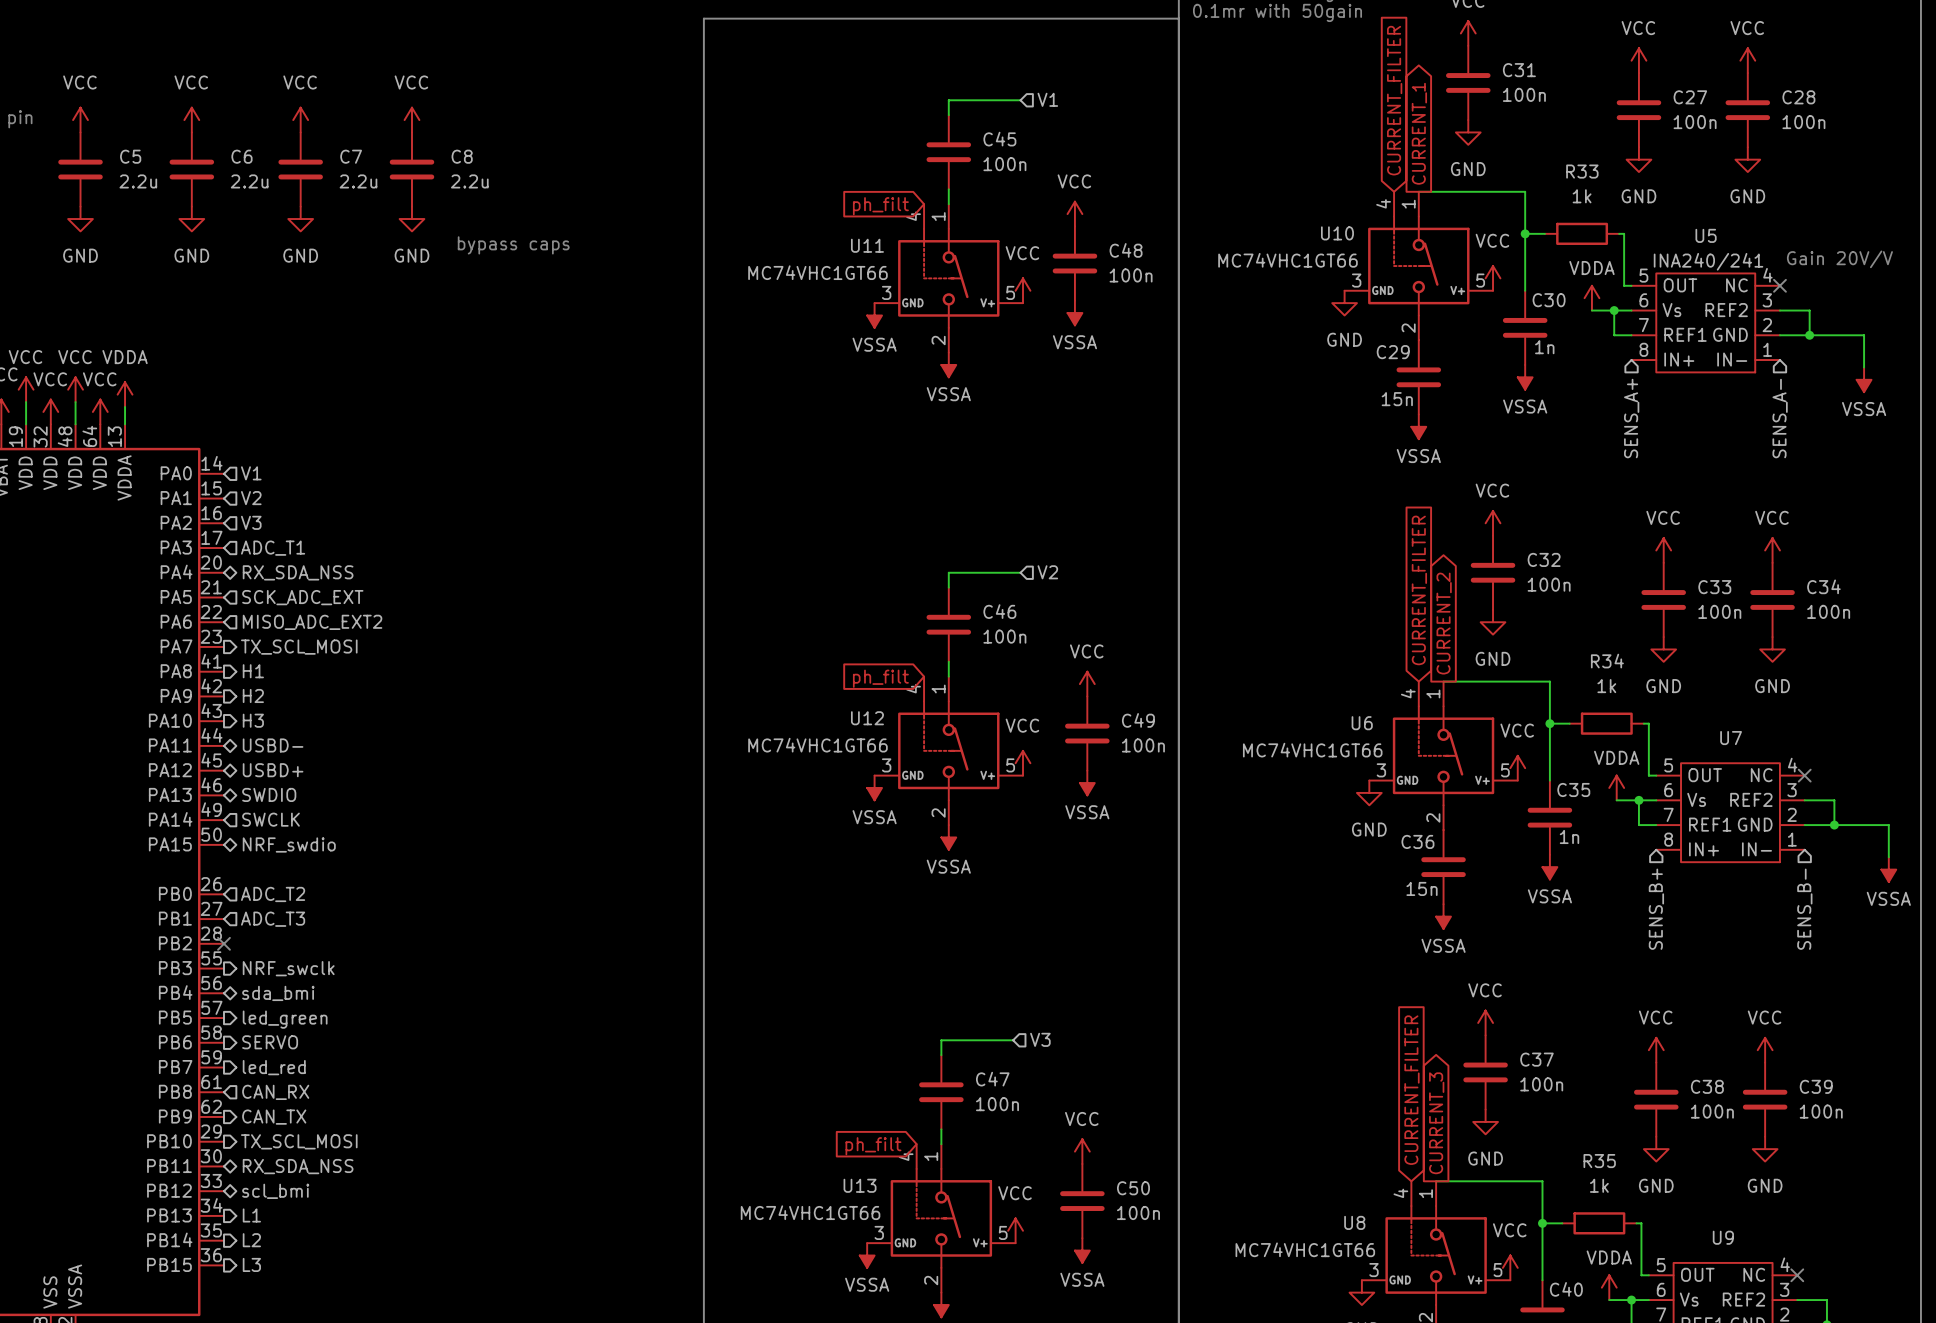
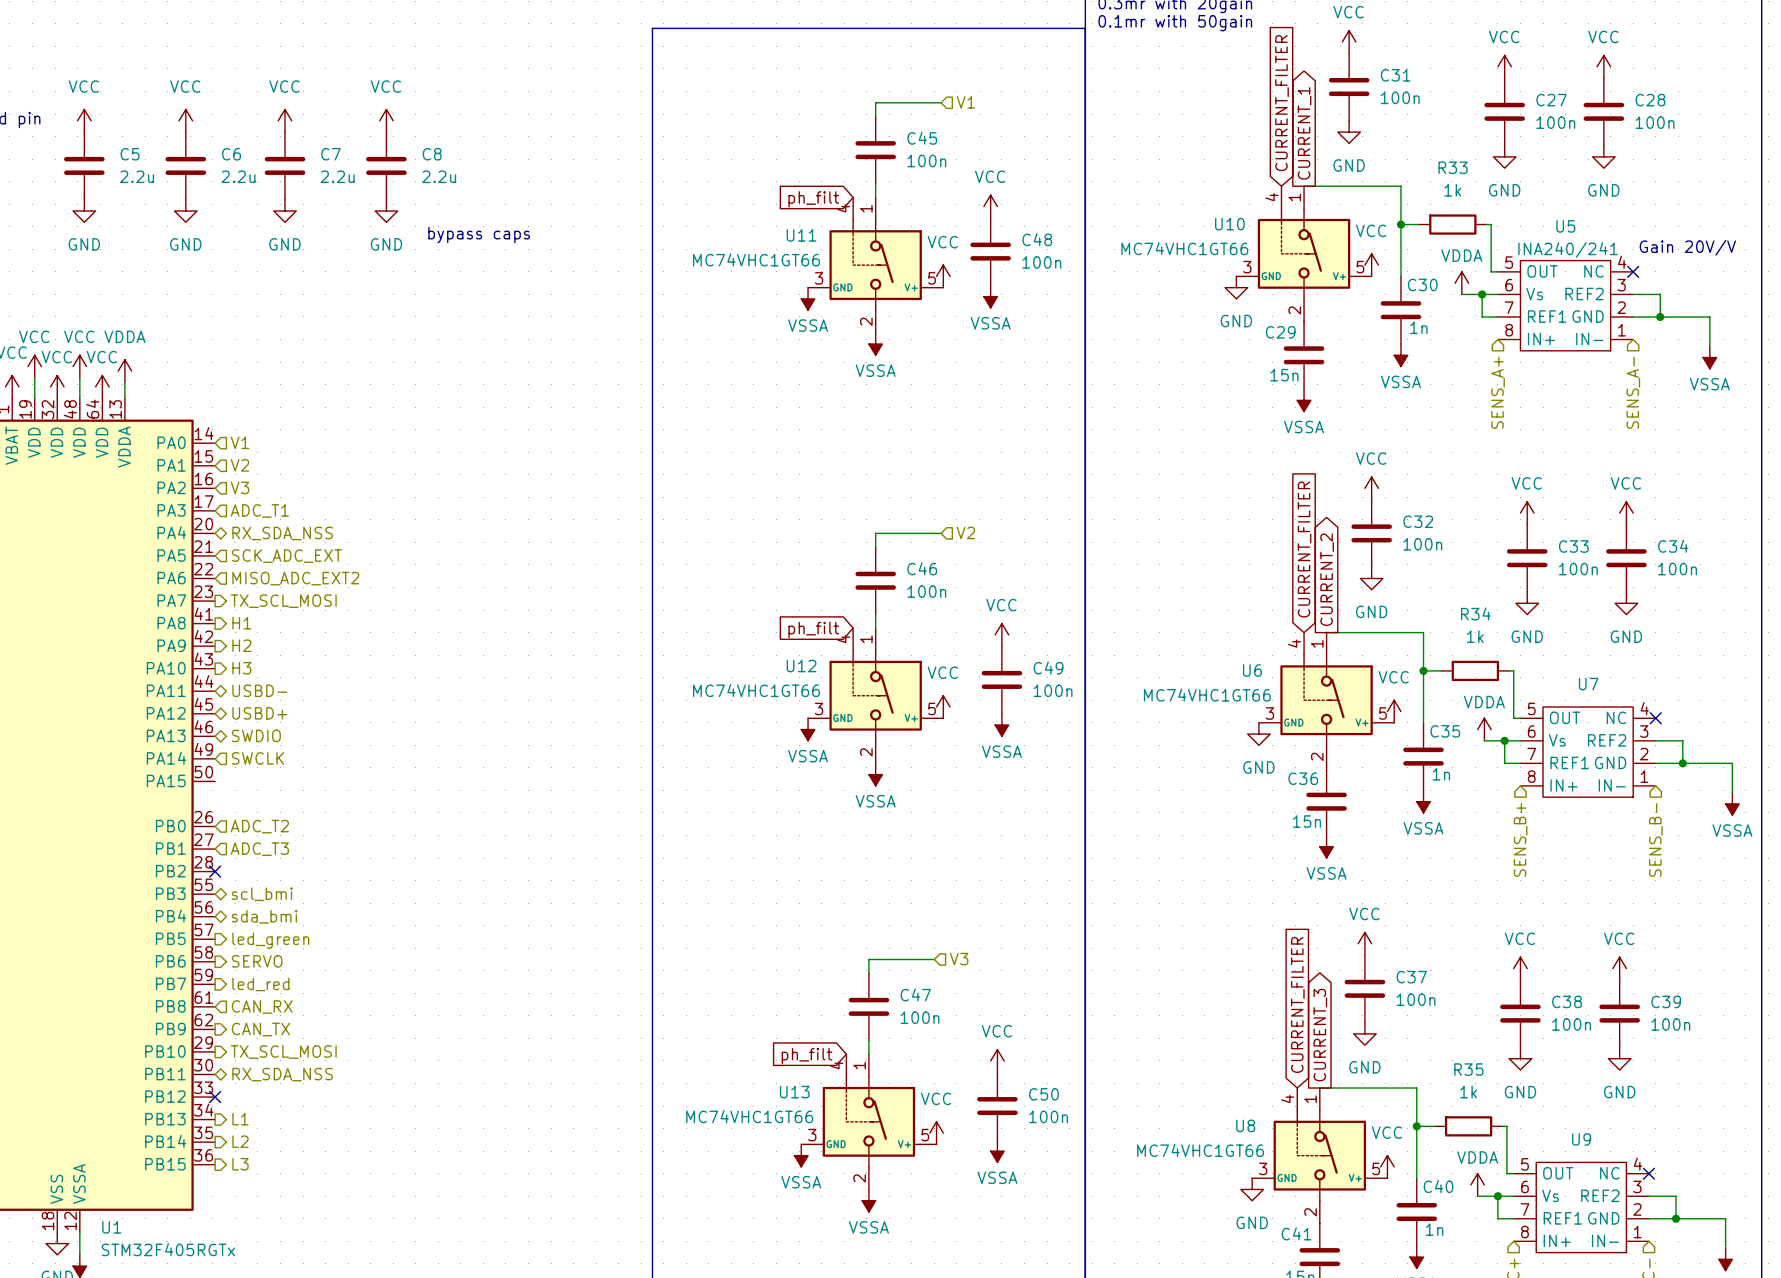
hierarchical label: NRF_swdio (289, 845) -> none
hierarchical label shape: output (288, 968) -> bidirectional (262, 894)
hierarchical label: NRF_swclk (288, 968) -> scl_bmi (262, 894)
no-connect mark: none -> (215, 1097)
hierarchical label: scl_bmi (275, 1191) -> none

